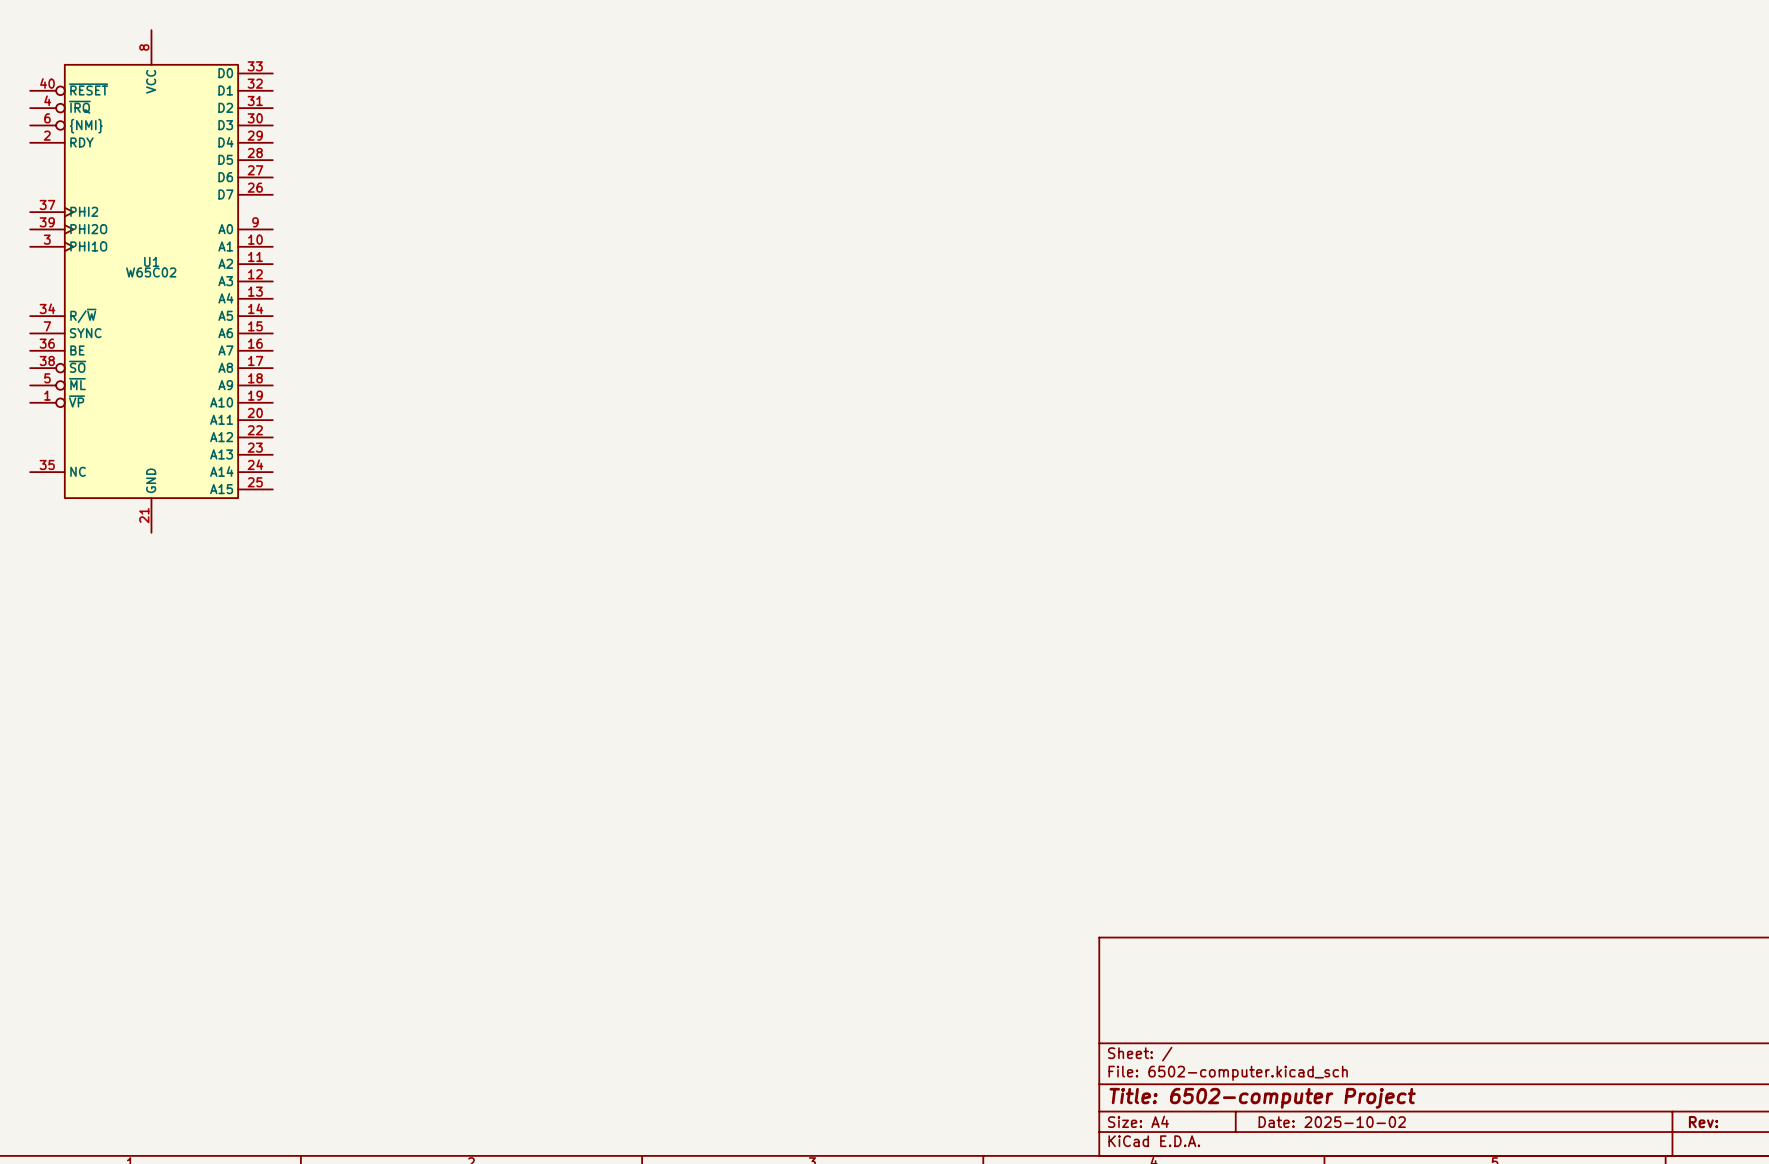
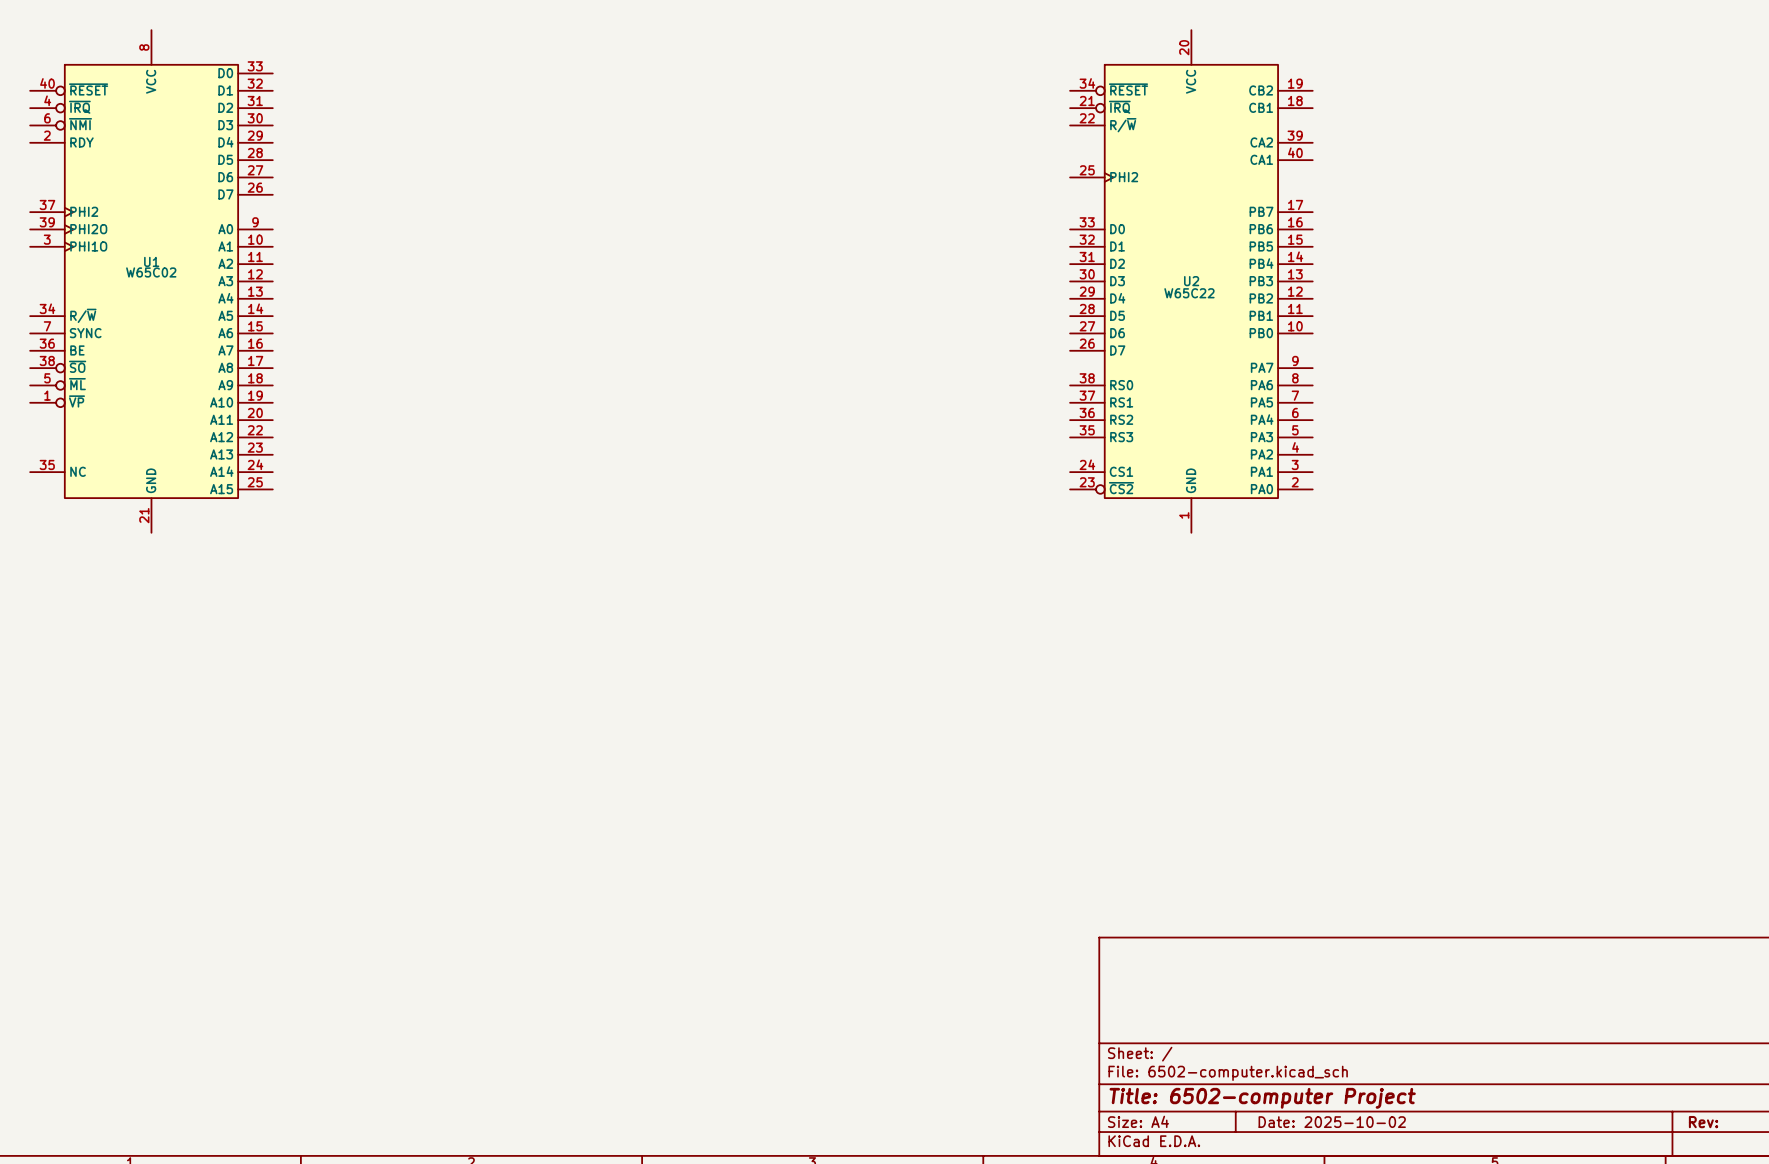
U1 pin name: {NMI} (86, 126) -> ~{NMI} (80, 124)
U2: none -> W65C22 (1191, 281)

